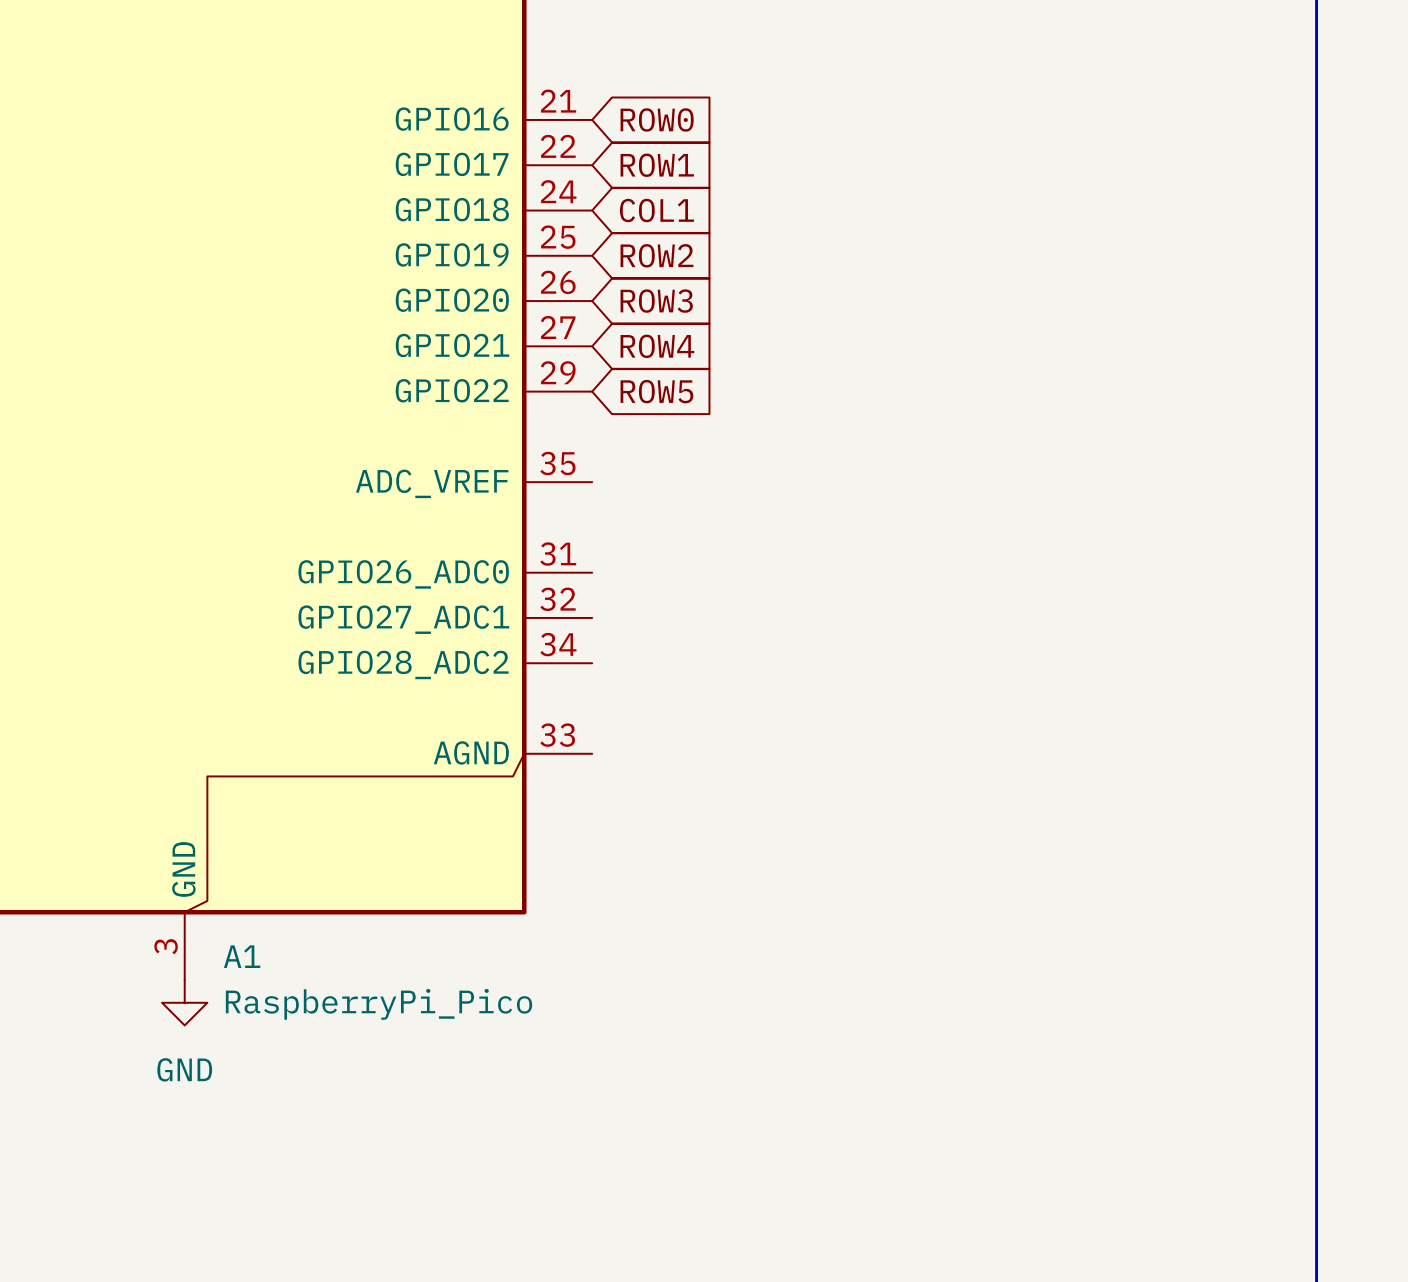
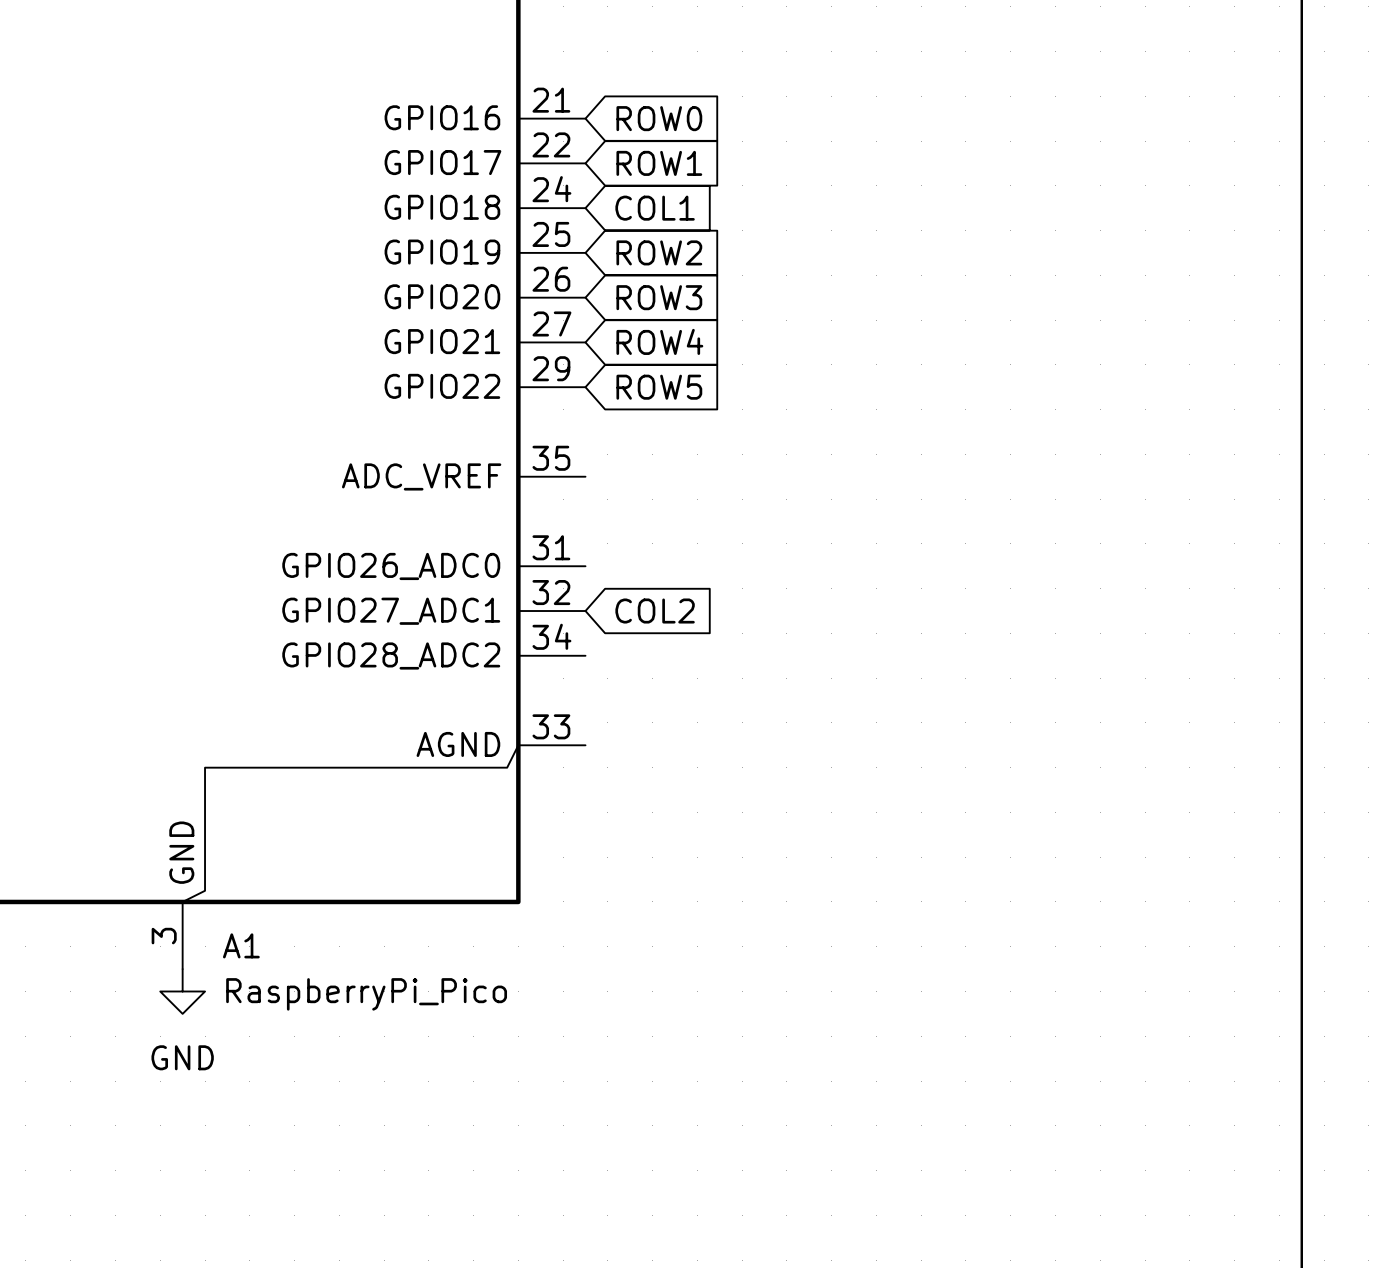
global label: none -> COL2 (655, 611)

